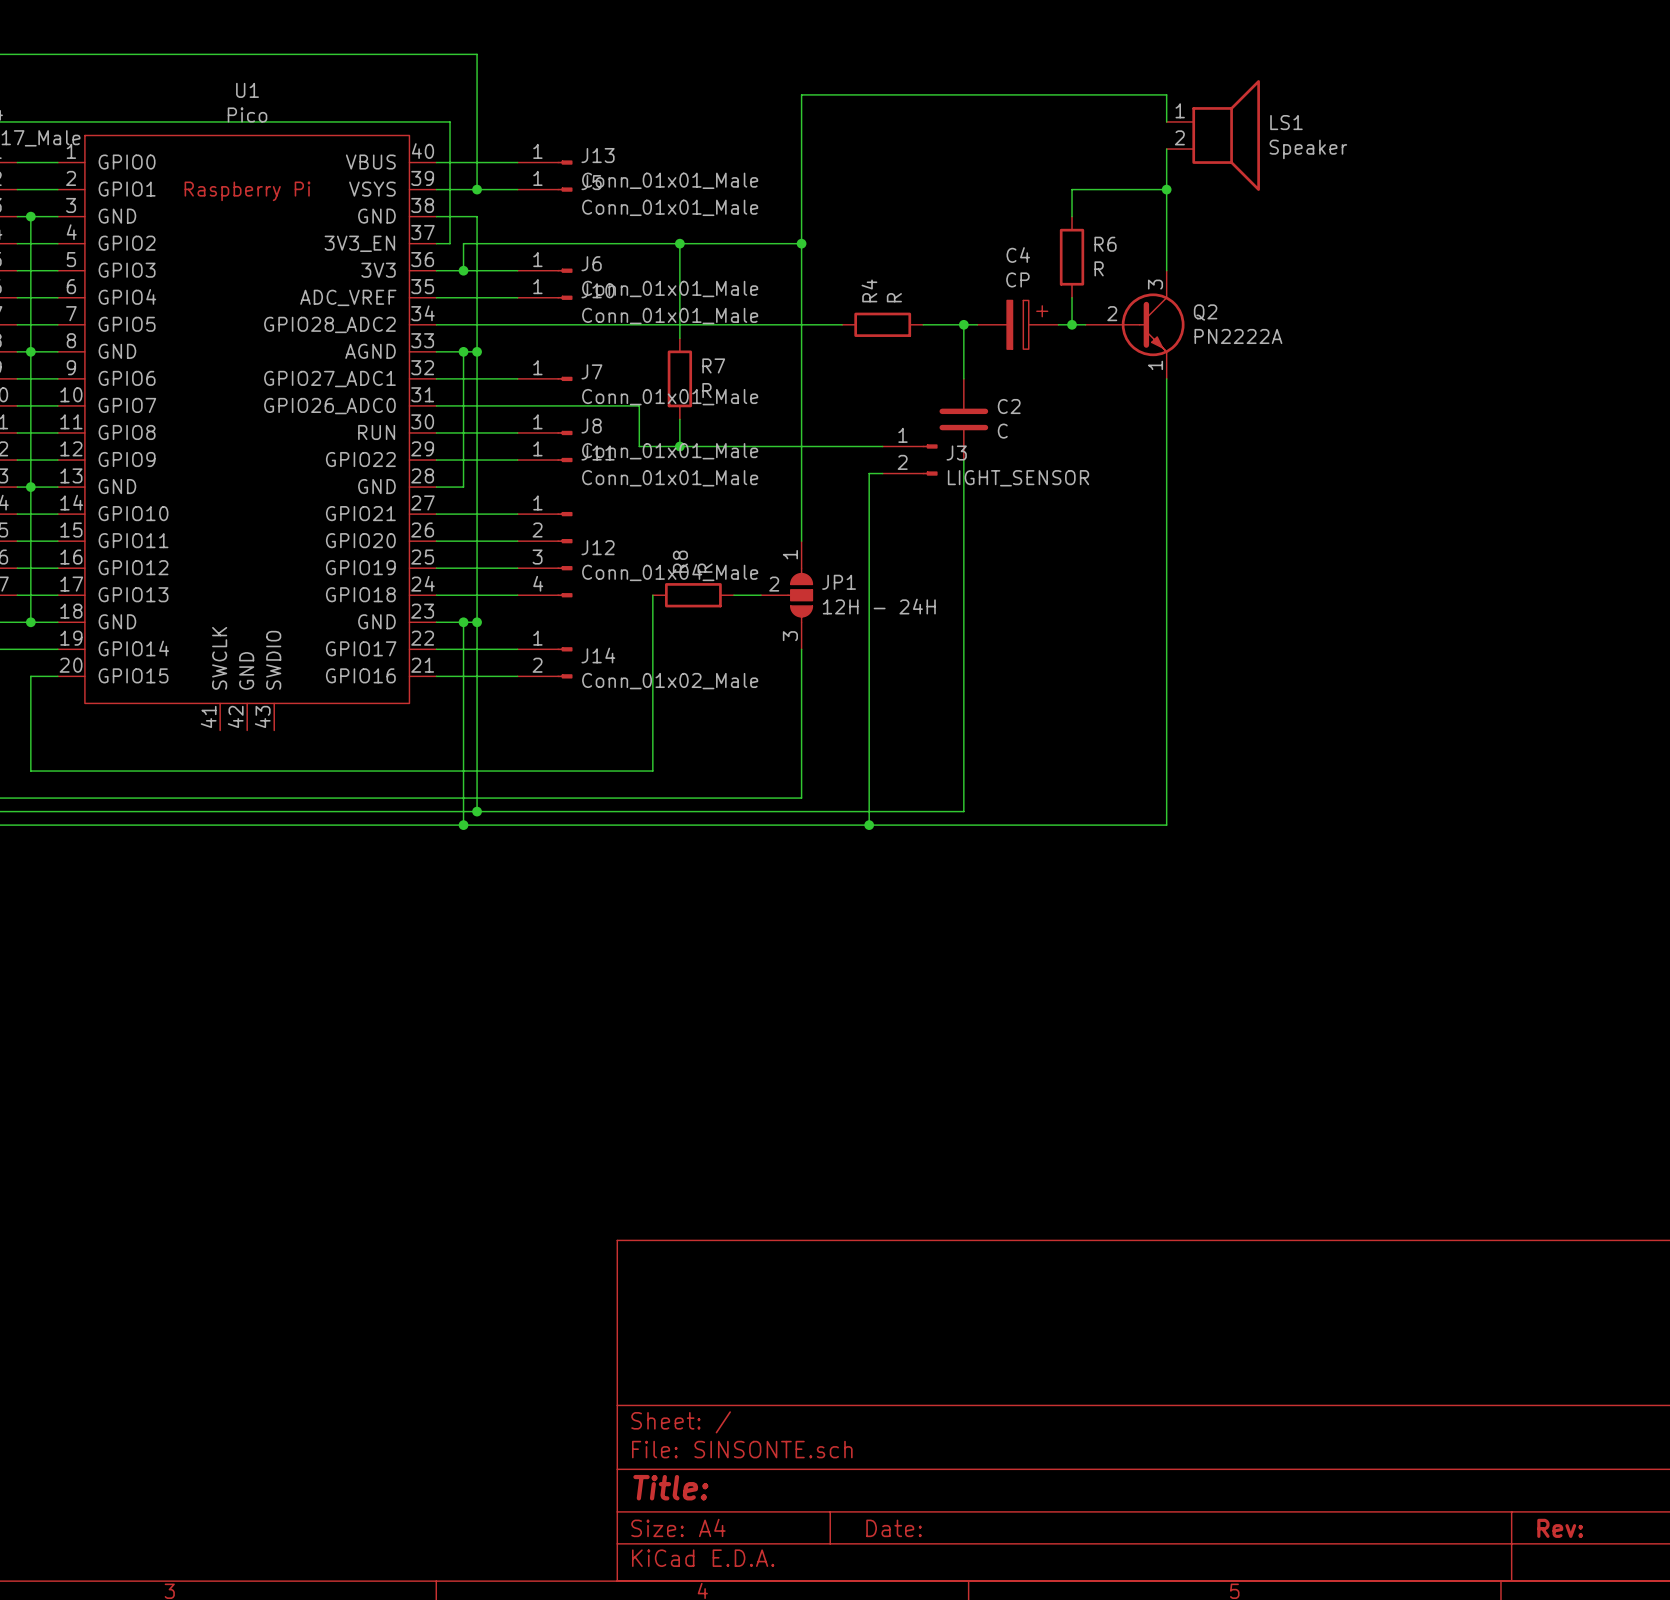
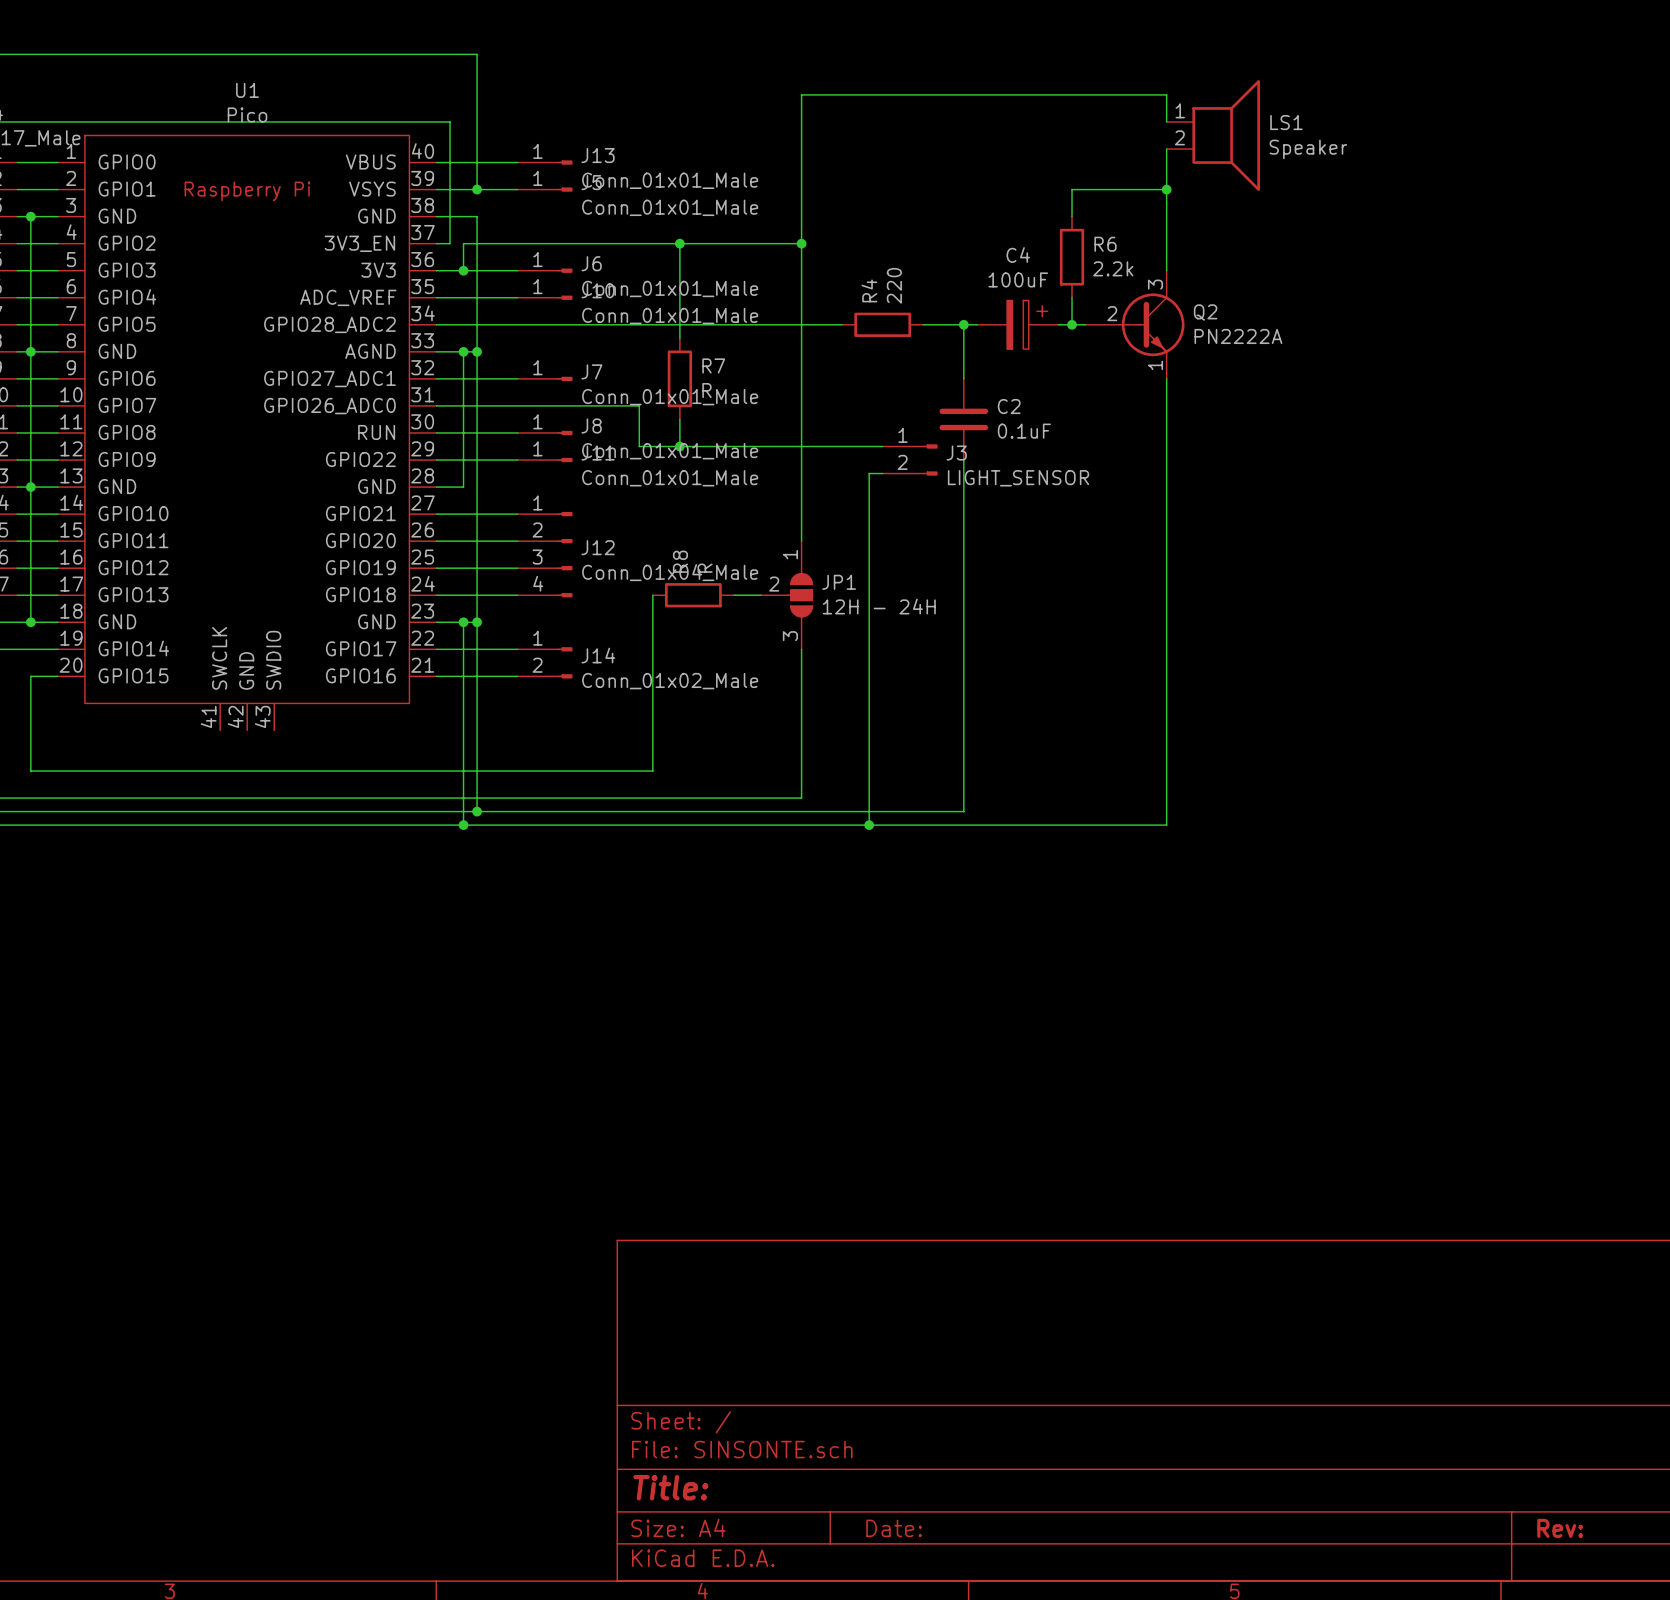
R6 value: R (1099, 268) -> 2.2k (1113, 268)
C4 value: CP (1017, 279) -> 100uF (1018, 279)
R4 value: R (894, 297) -> 220 (894, 285)
C2 value: C (1002, 431) -> 0.1uF (1024, 431)

